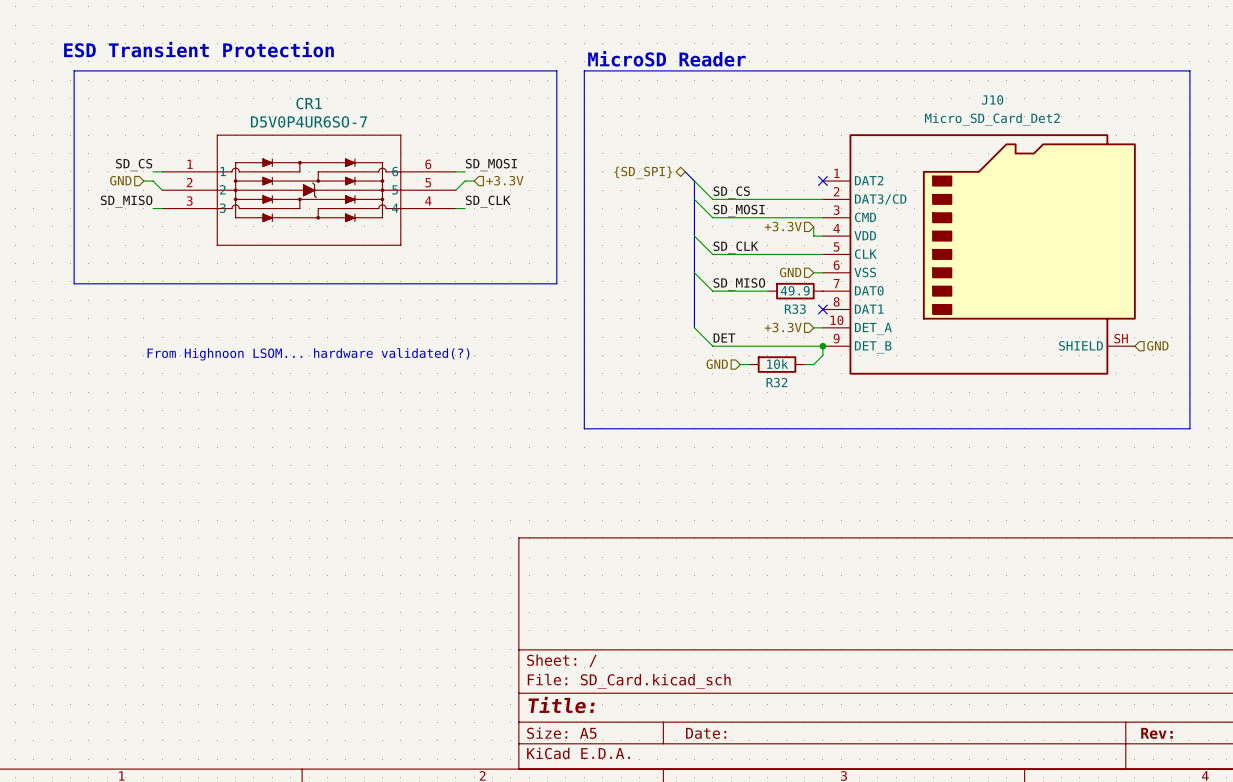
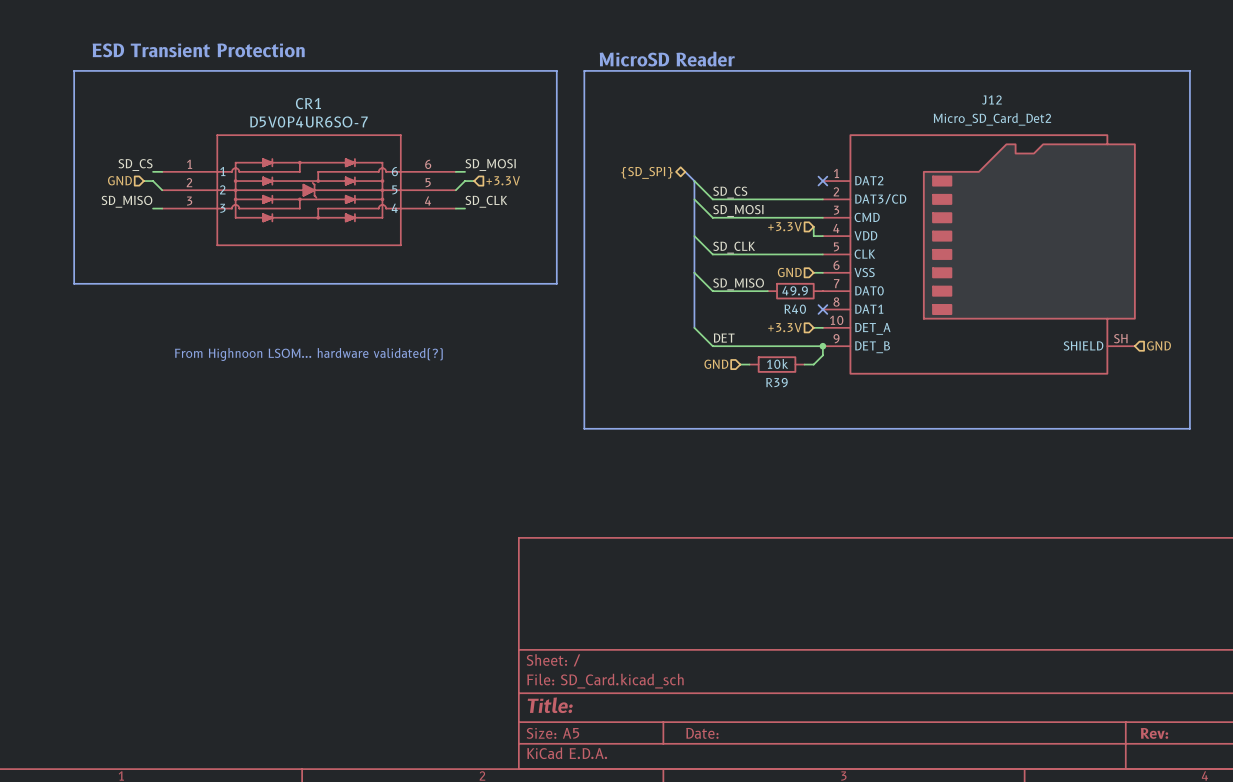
J10 name: J10 (992, 99) -> J12 (991, 100)
R33 name: R33 (795, 309) -> R40 (795, 309)
R32 name: R32 (776, 382) -> R39 (776, 382)

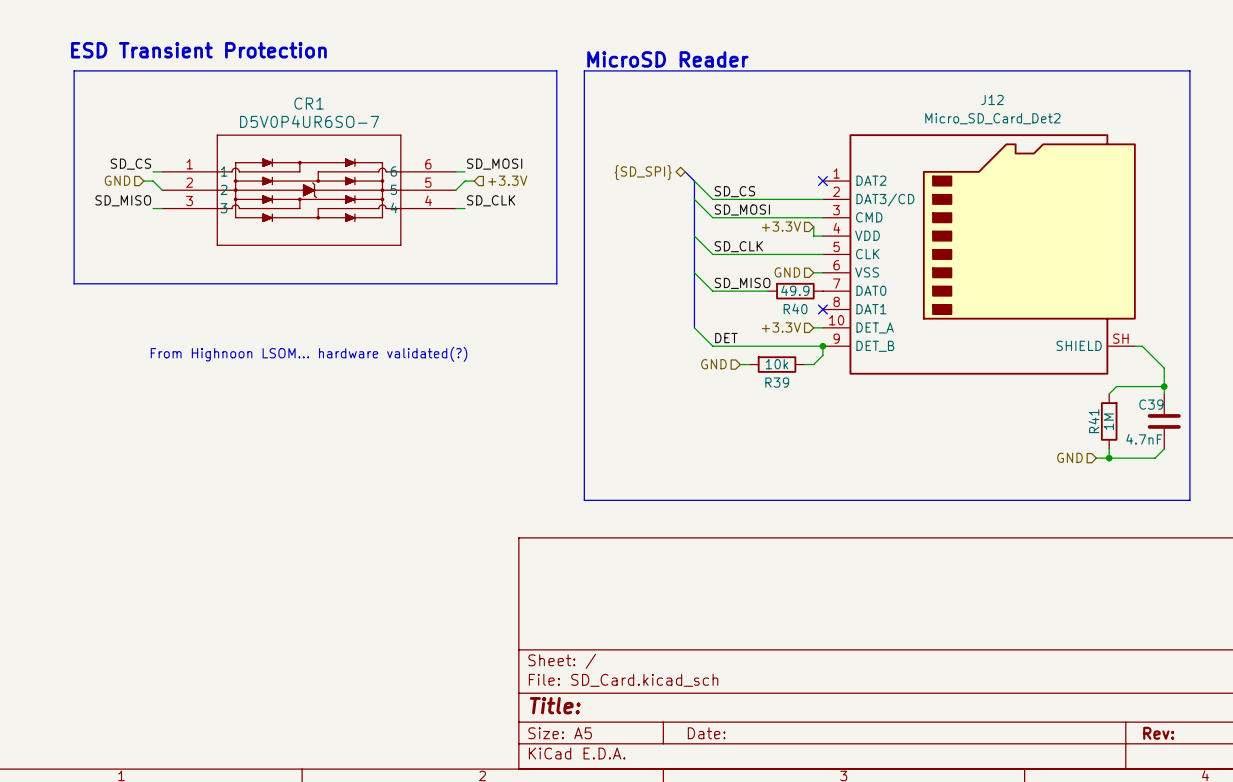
hierarchical label rotation: 0° (1159, 345) -> 180° (1069, 457)
hierarchical label position: GND (1159, 345) -> GND (1069, 457)
wire: none -> (1134, 346) (1142, 346) (1164, 368) (1164, 393)
wire: none -> (1164, 386) (1116, 386) (1109, 393)
junction: none -> (1164, 386)
R41: none -> 1M (1109, 421)
C39: none -> 4.7nF (1164, 421)
line: (584, 428) (1189, 428) -> (584, 428) (584, 500) (1189, 500) (1189, 428)
wire: none -> (1109, 448) (1109, 458)
wire: none -> (1164, 448) (1155, 458) (1096, 458)
junction: none -> (1109, 458)

